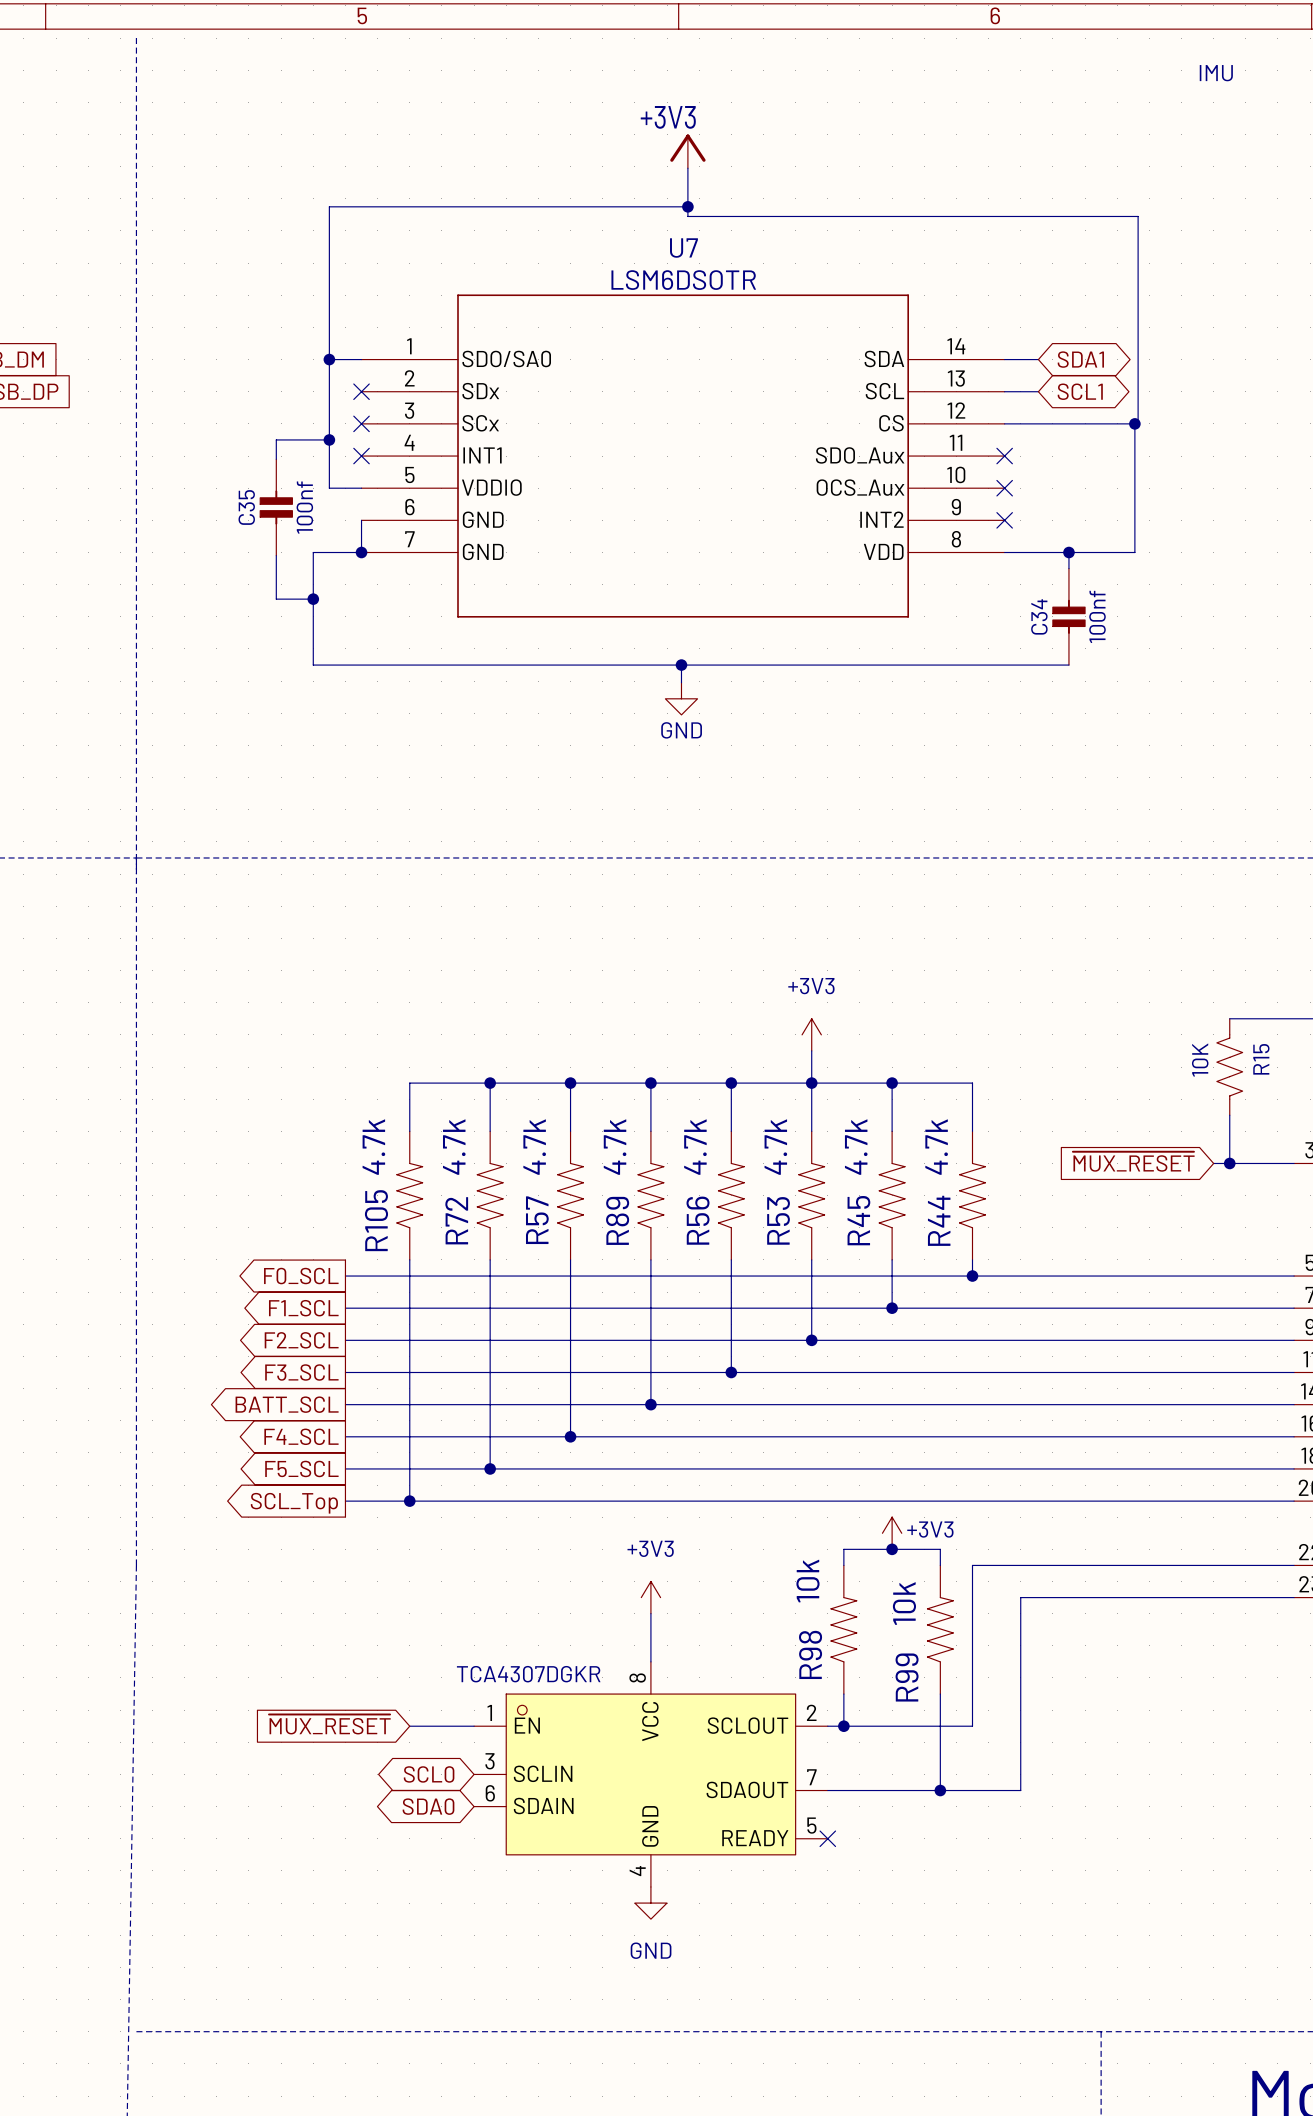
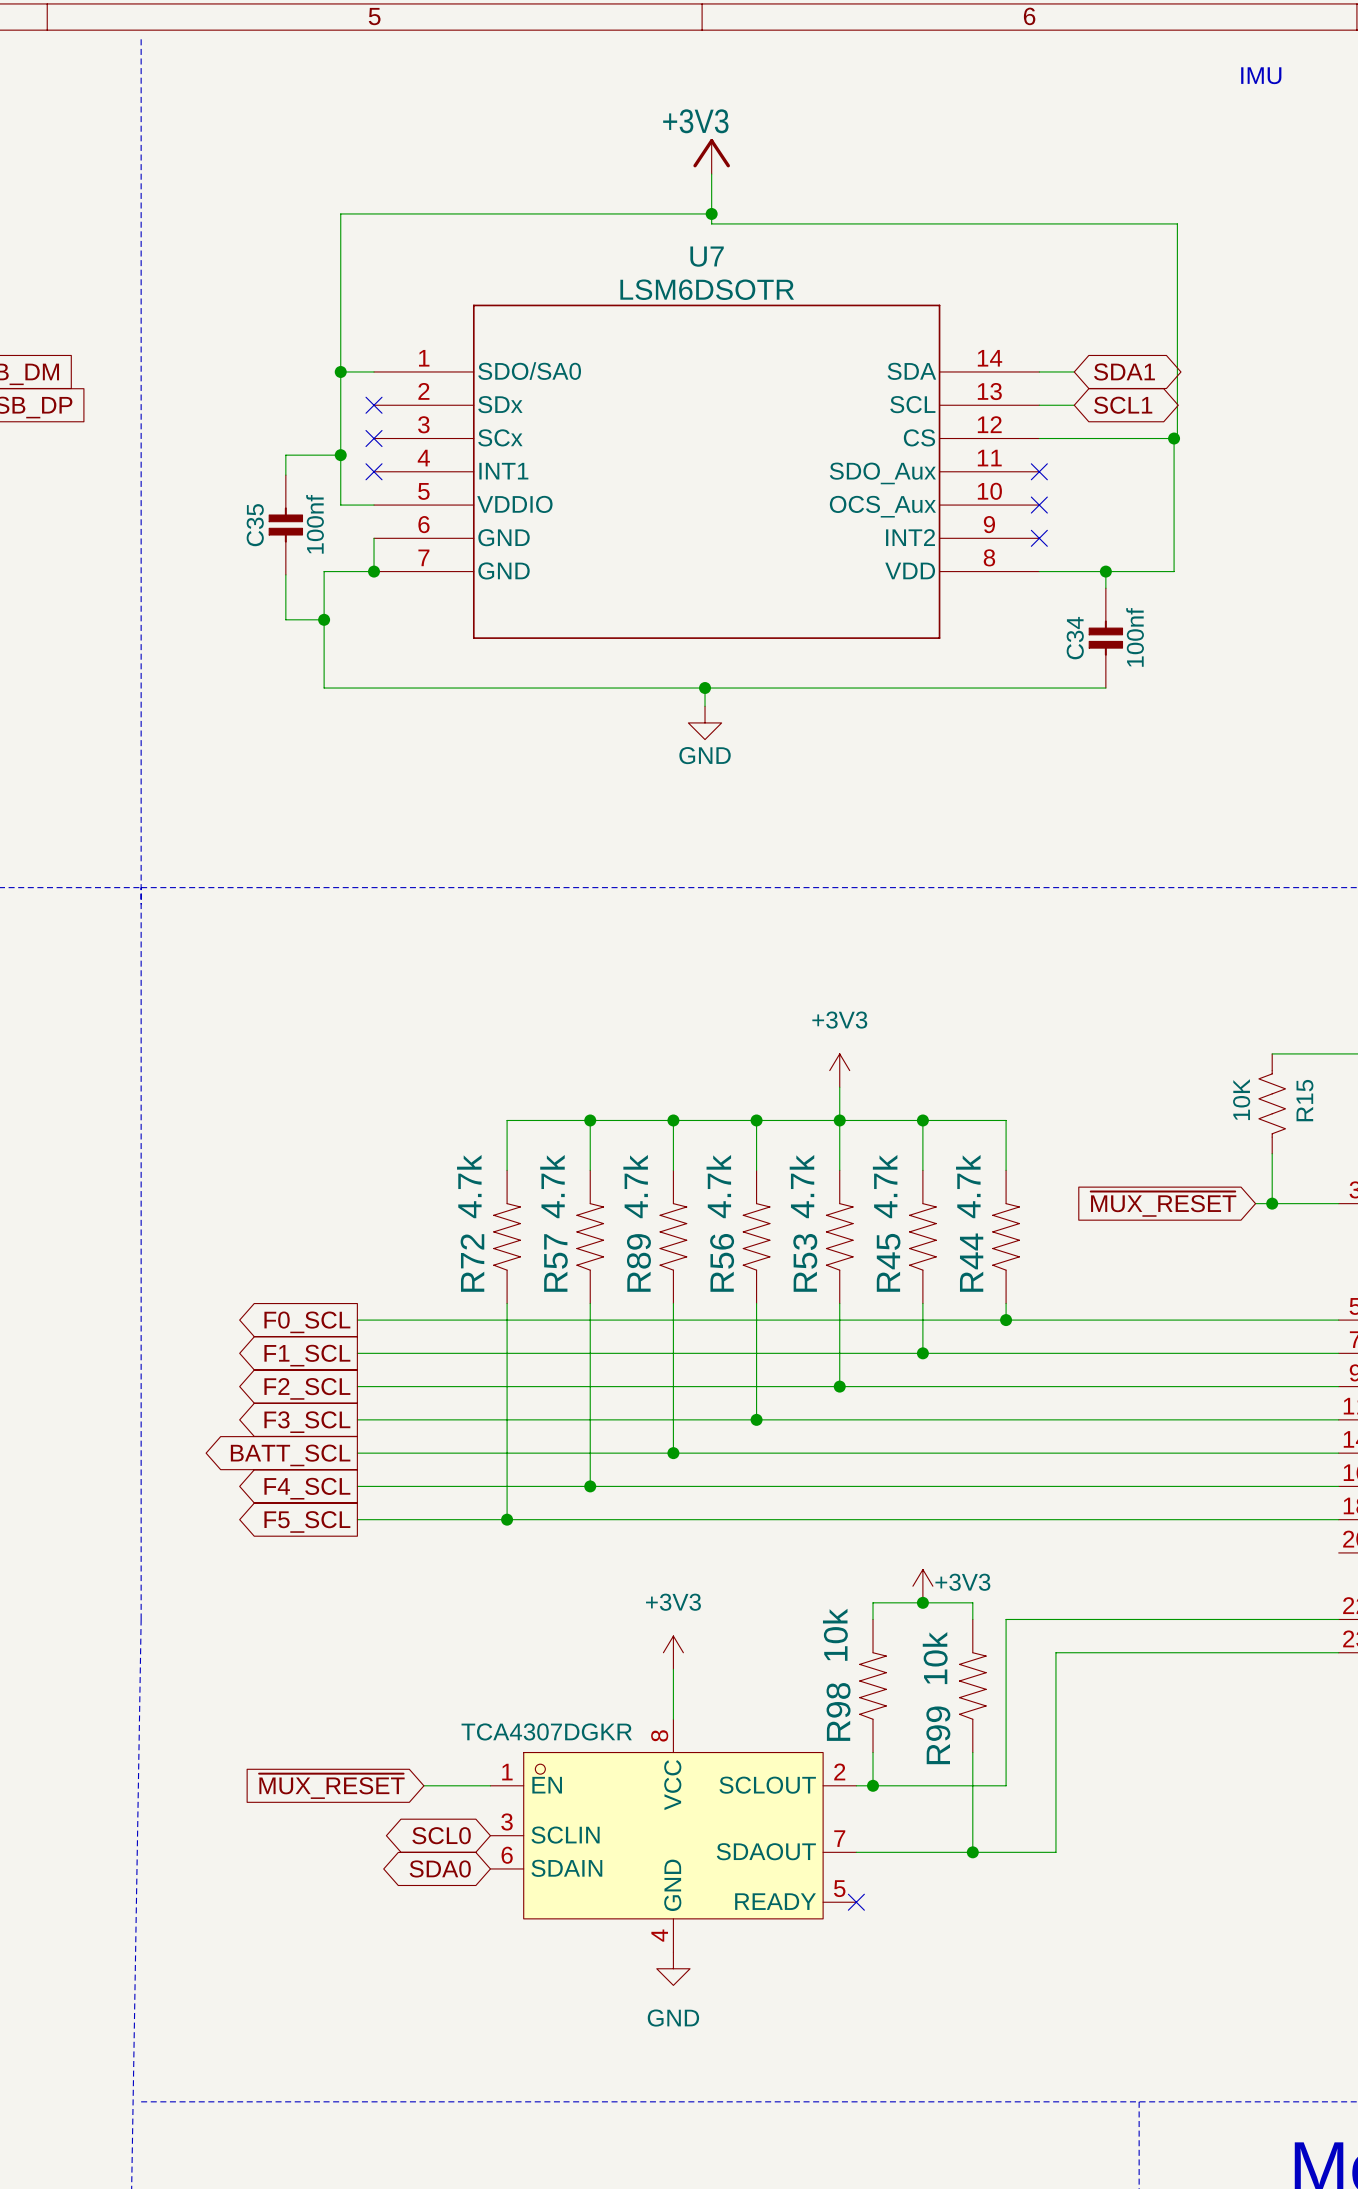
wire: (490, 1083) (409, 1083) (409, 1131) -> none
junction: (490, 1083) -> none
R105: 4.7k (409, 1195) -> none
wire: (409, 1259) (409, 1501) -> none
wire: (345, 1501) (1294, 1501) -> none
junction: (409, 1501) -> none
global label: SCL_Top (294, 1503) -> none

